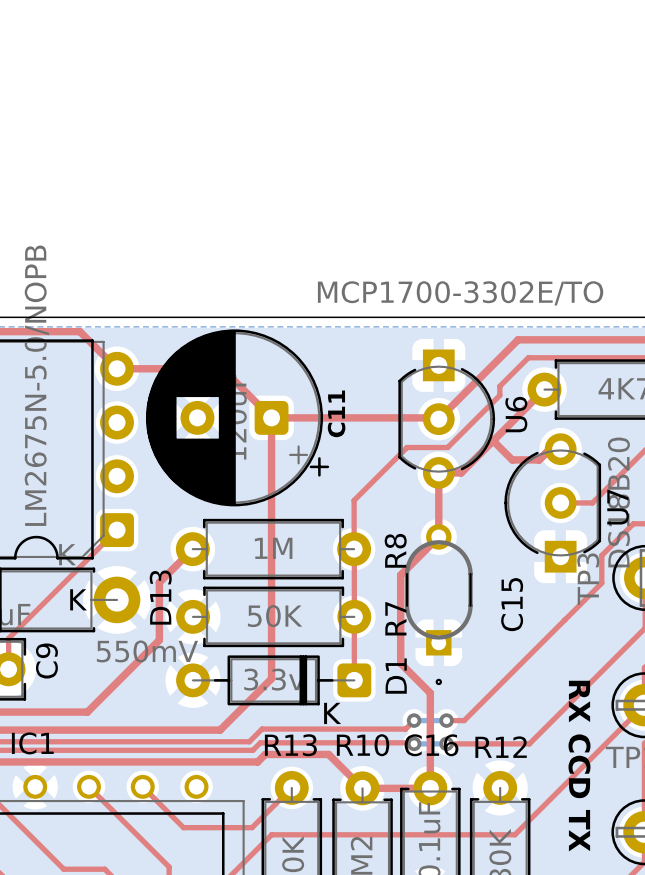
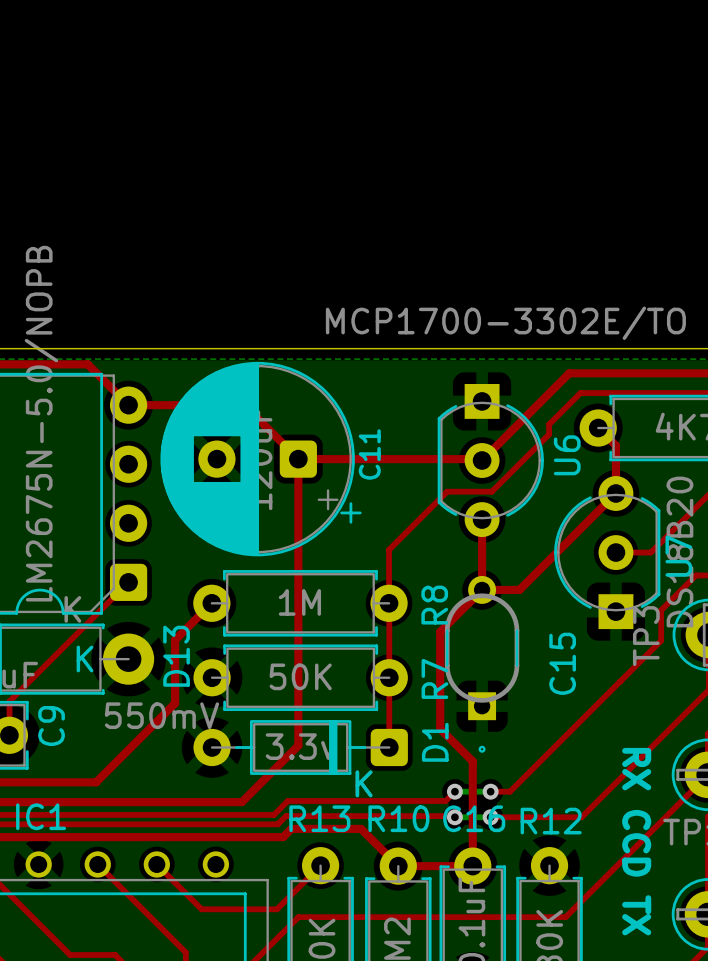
top track: (544, 389) (461, 472) (438, 472) -> (598, 428) (615, 445) (615, 493) (519, 589) (482, 589)
top track: (560, 438) (539, 459) (512, 459) (493, 440) -> none

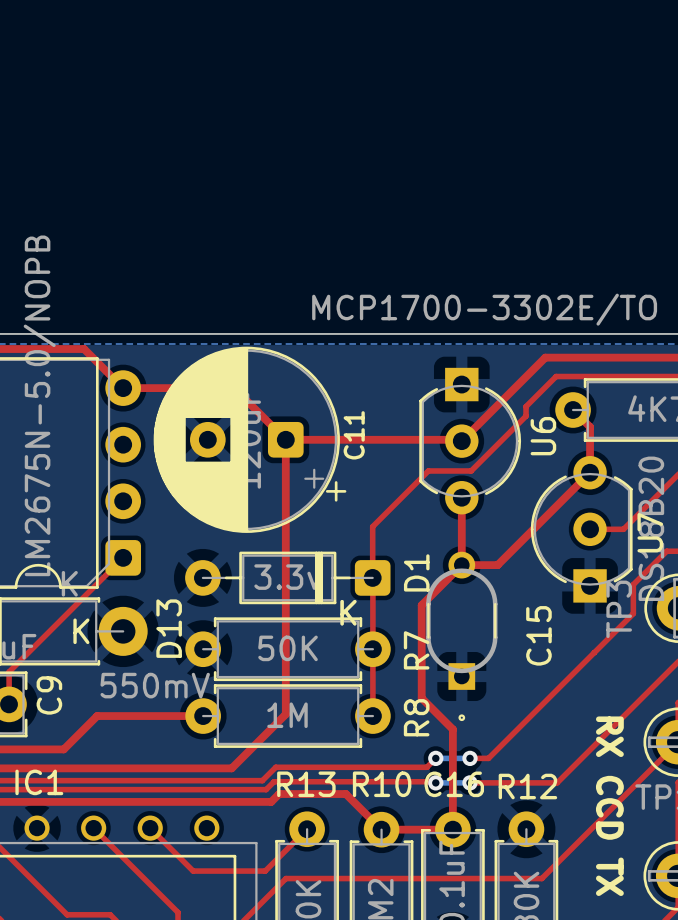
top track: (211, 603) (175, 640) (175, 703) (96, 782) (66, 782) -> (203, 716) (97, 716) (63, 749)
R8 position: (300, 603) -> (288, 716)
D1 position: (300, 747) -> (287, 577)

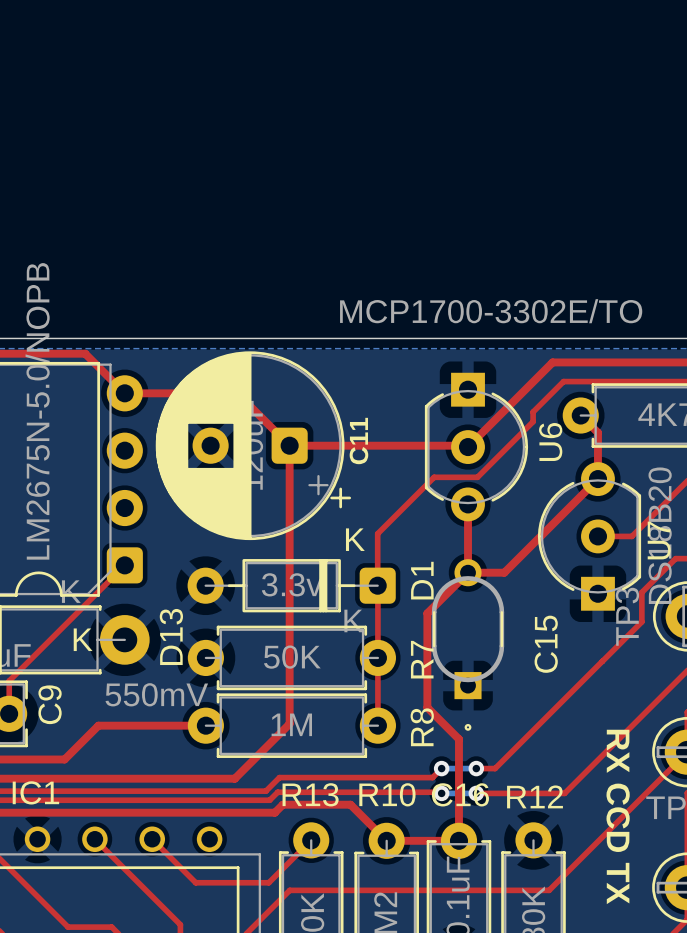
D1 footprint: [185, 551, 391, 605] -> [187, 559, 396, 613]

